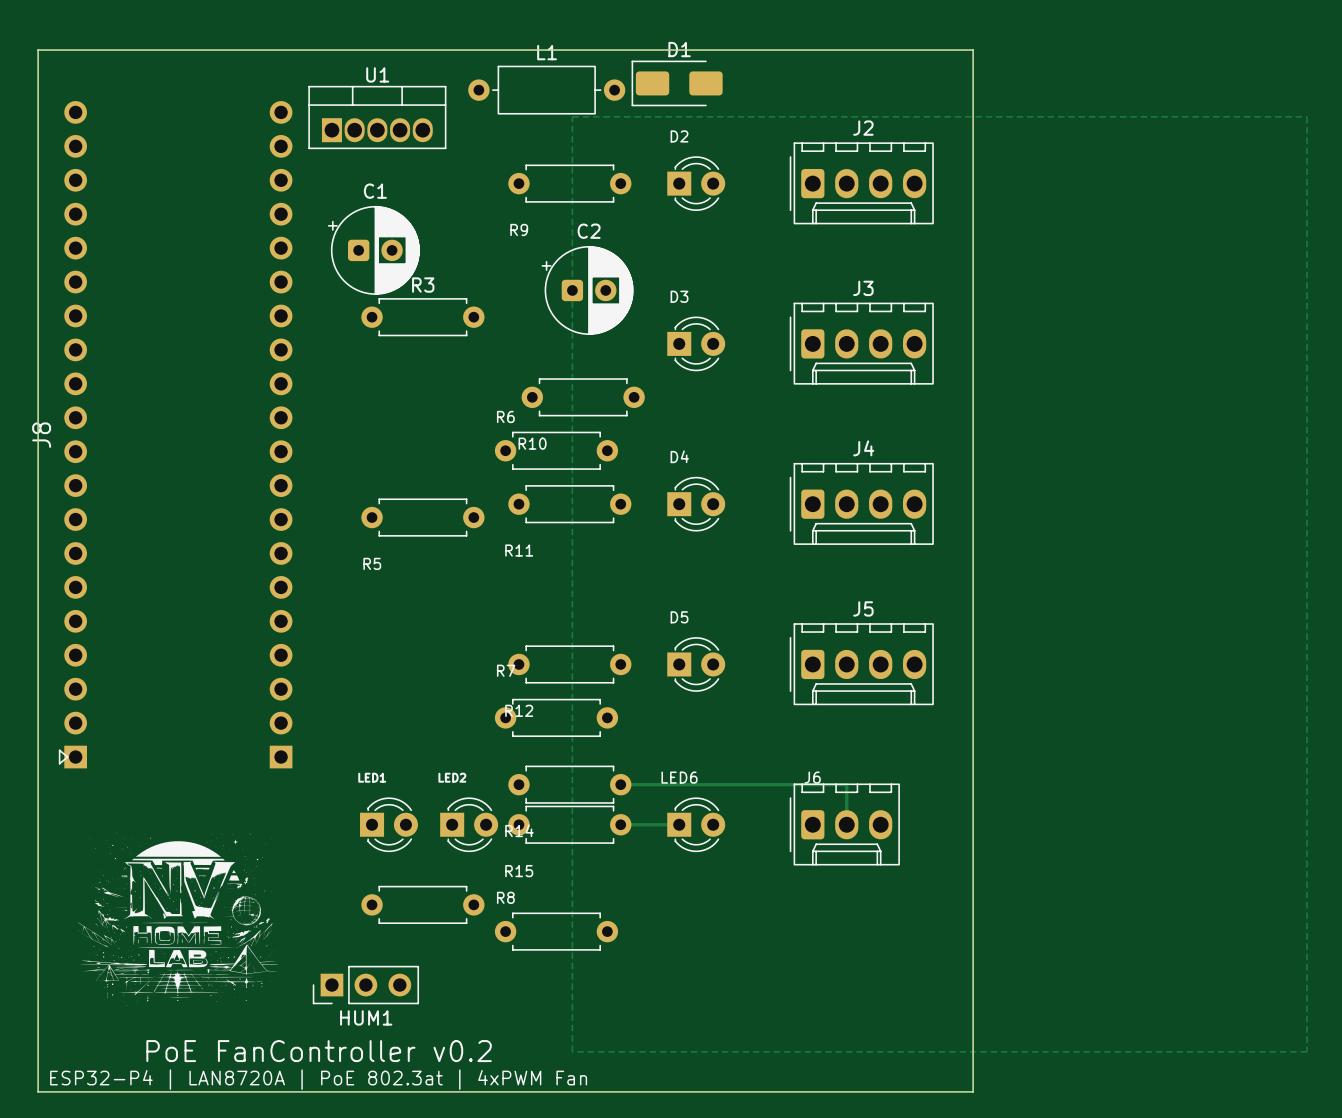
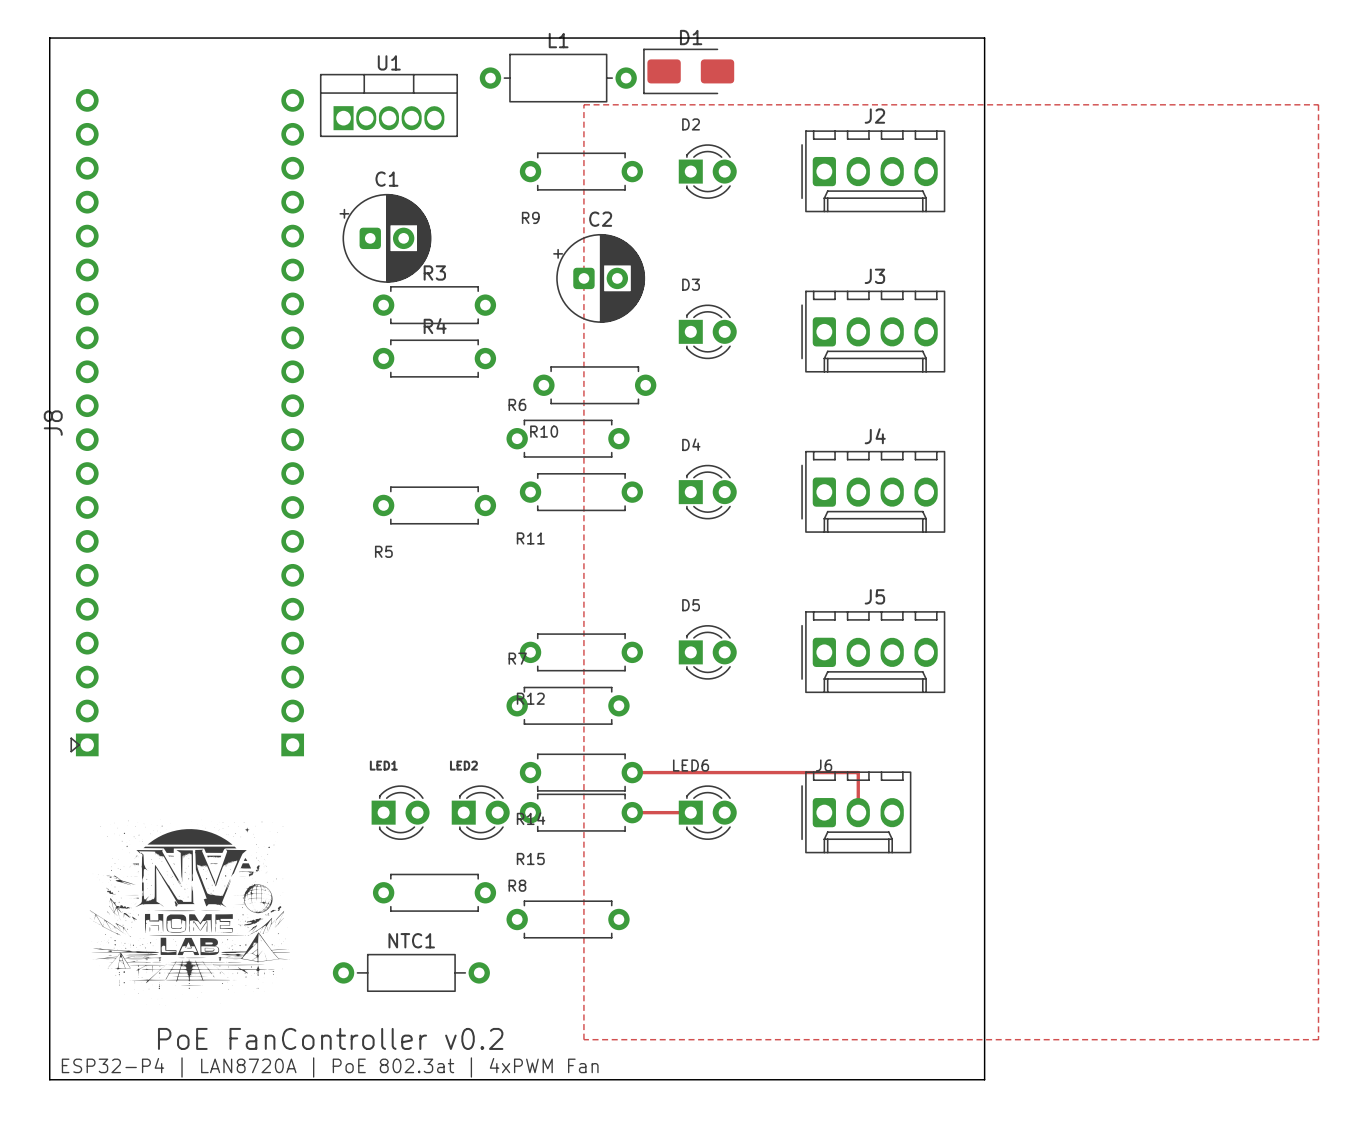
R4: none -> (434, 358)
HUM1: (365, 985) -> none
NTC1: none -> (411, 972)

